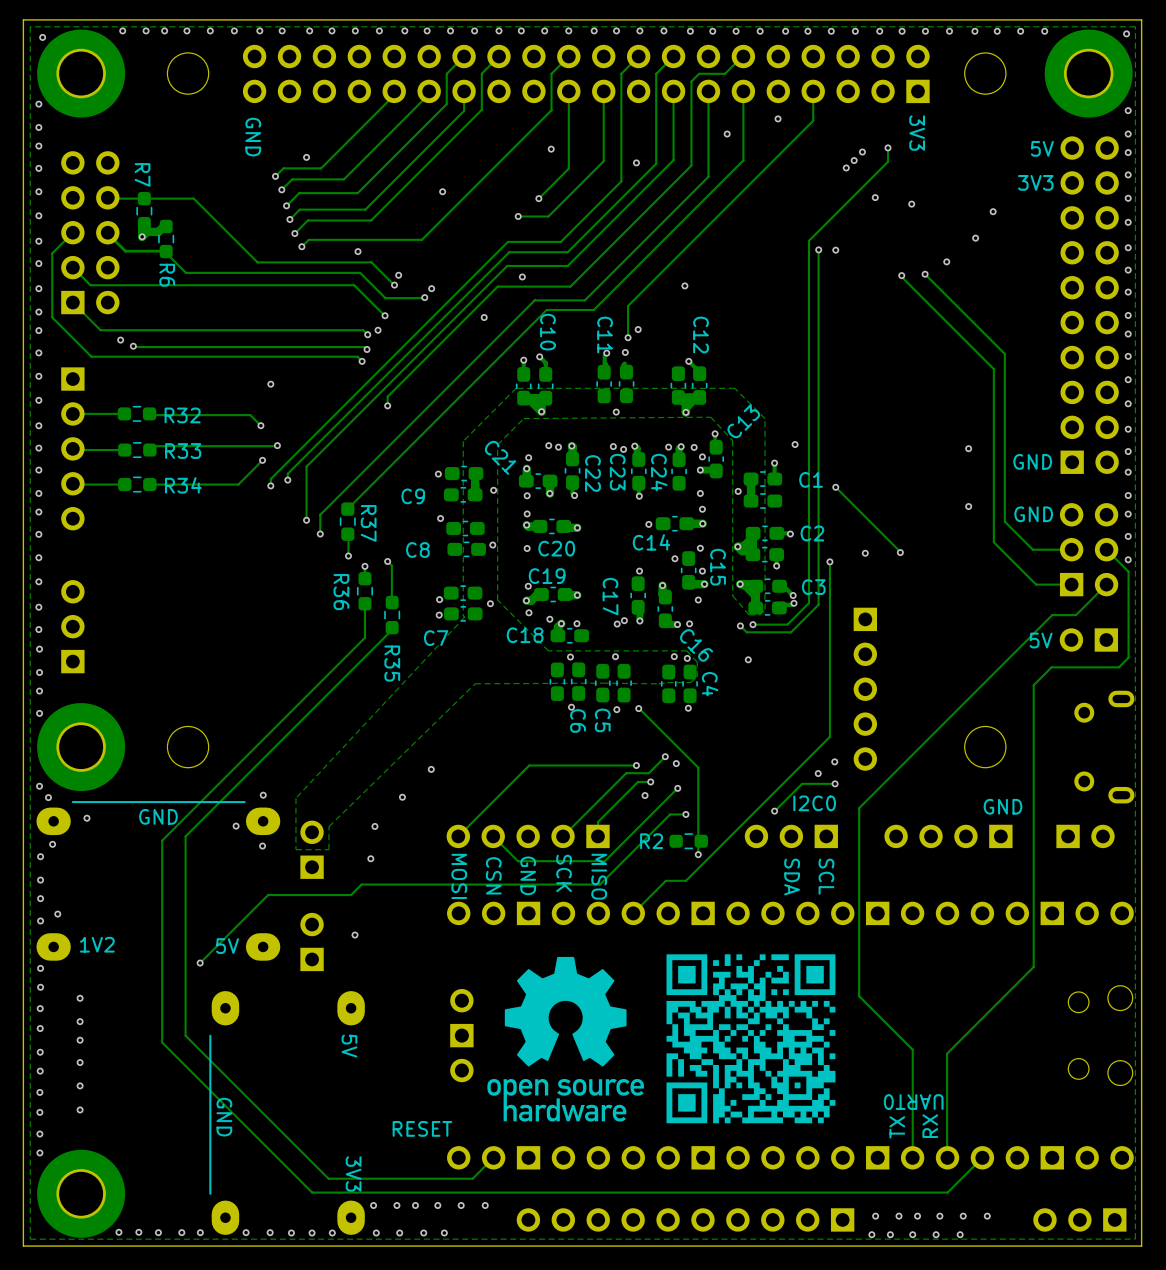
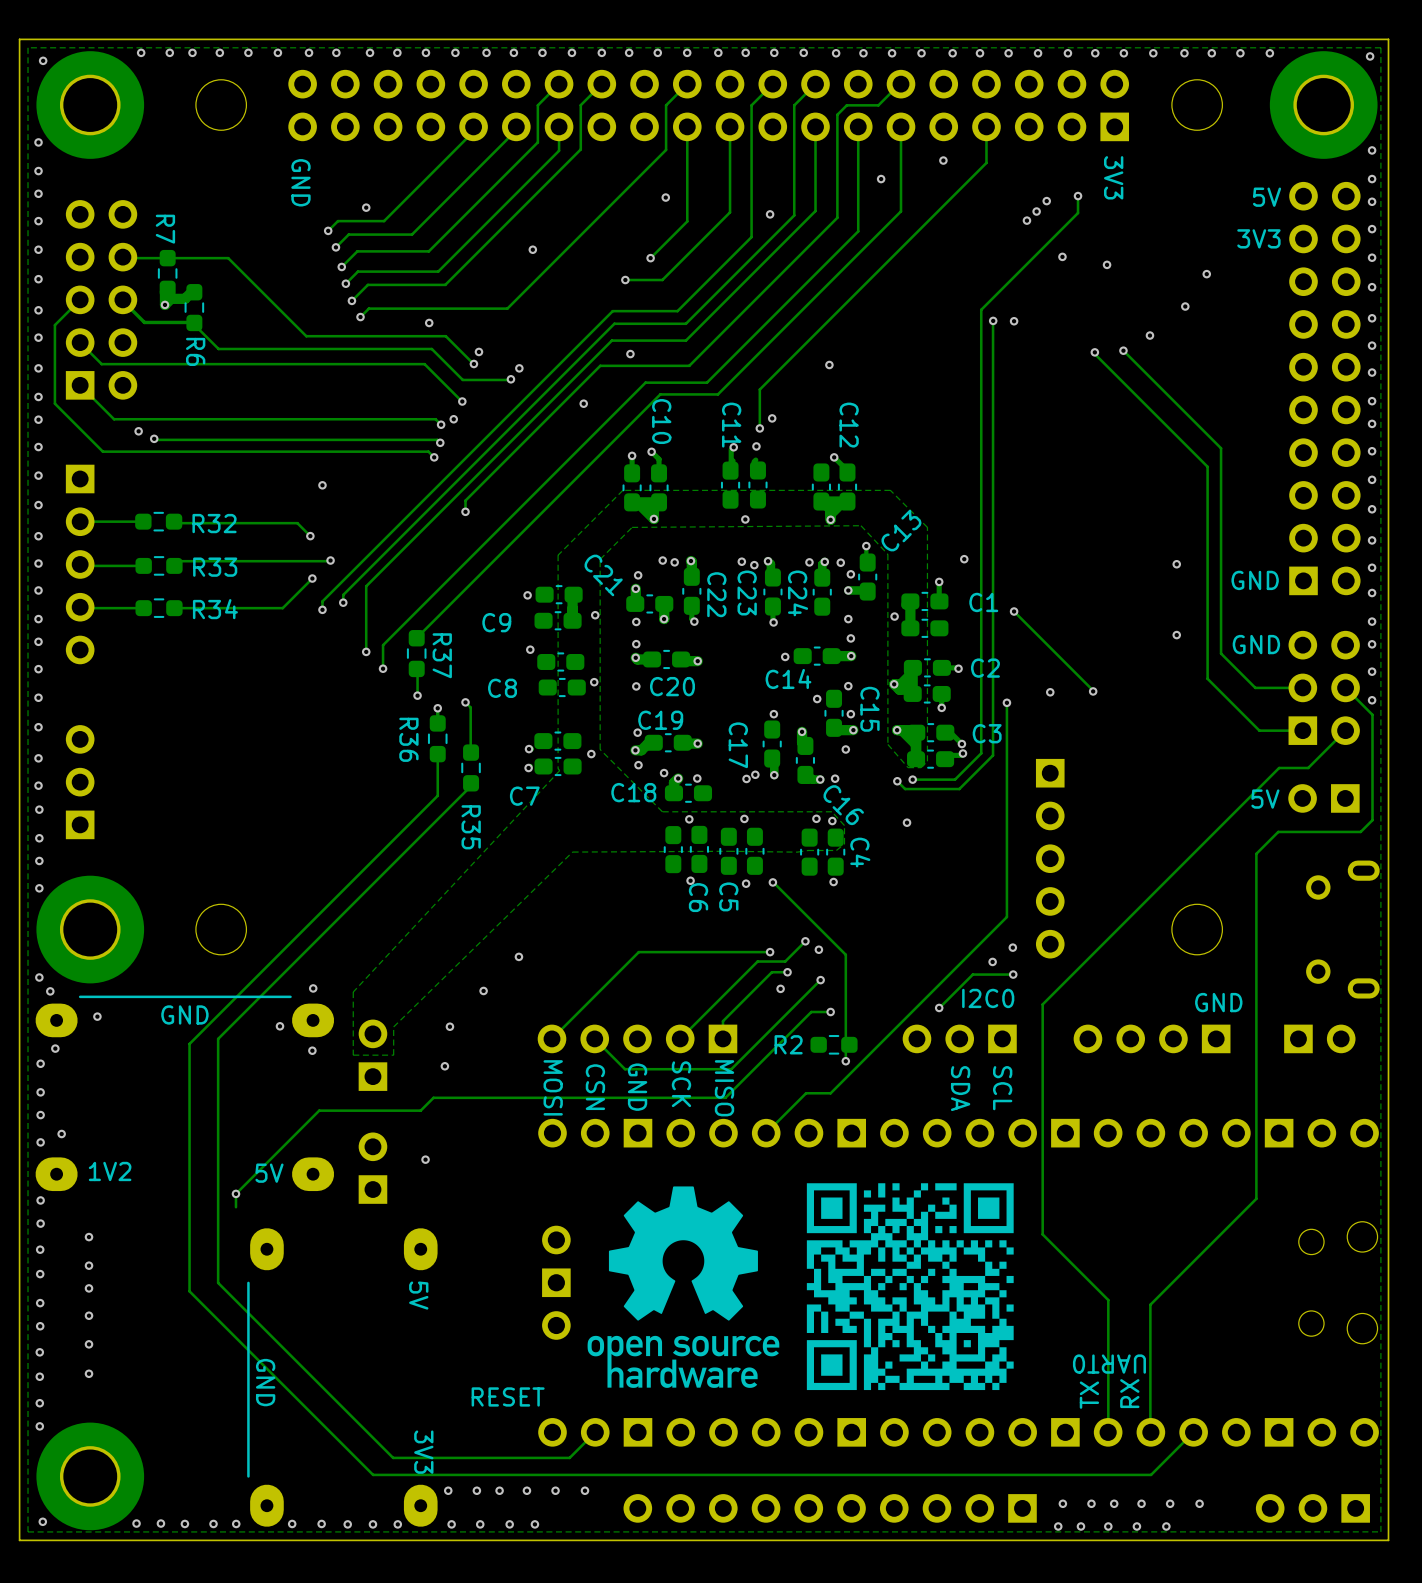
track: none -> (235, 1193) (235, 1207)
via: none -> (42, 1521)

